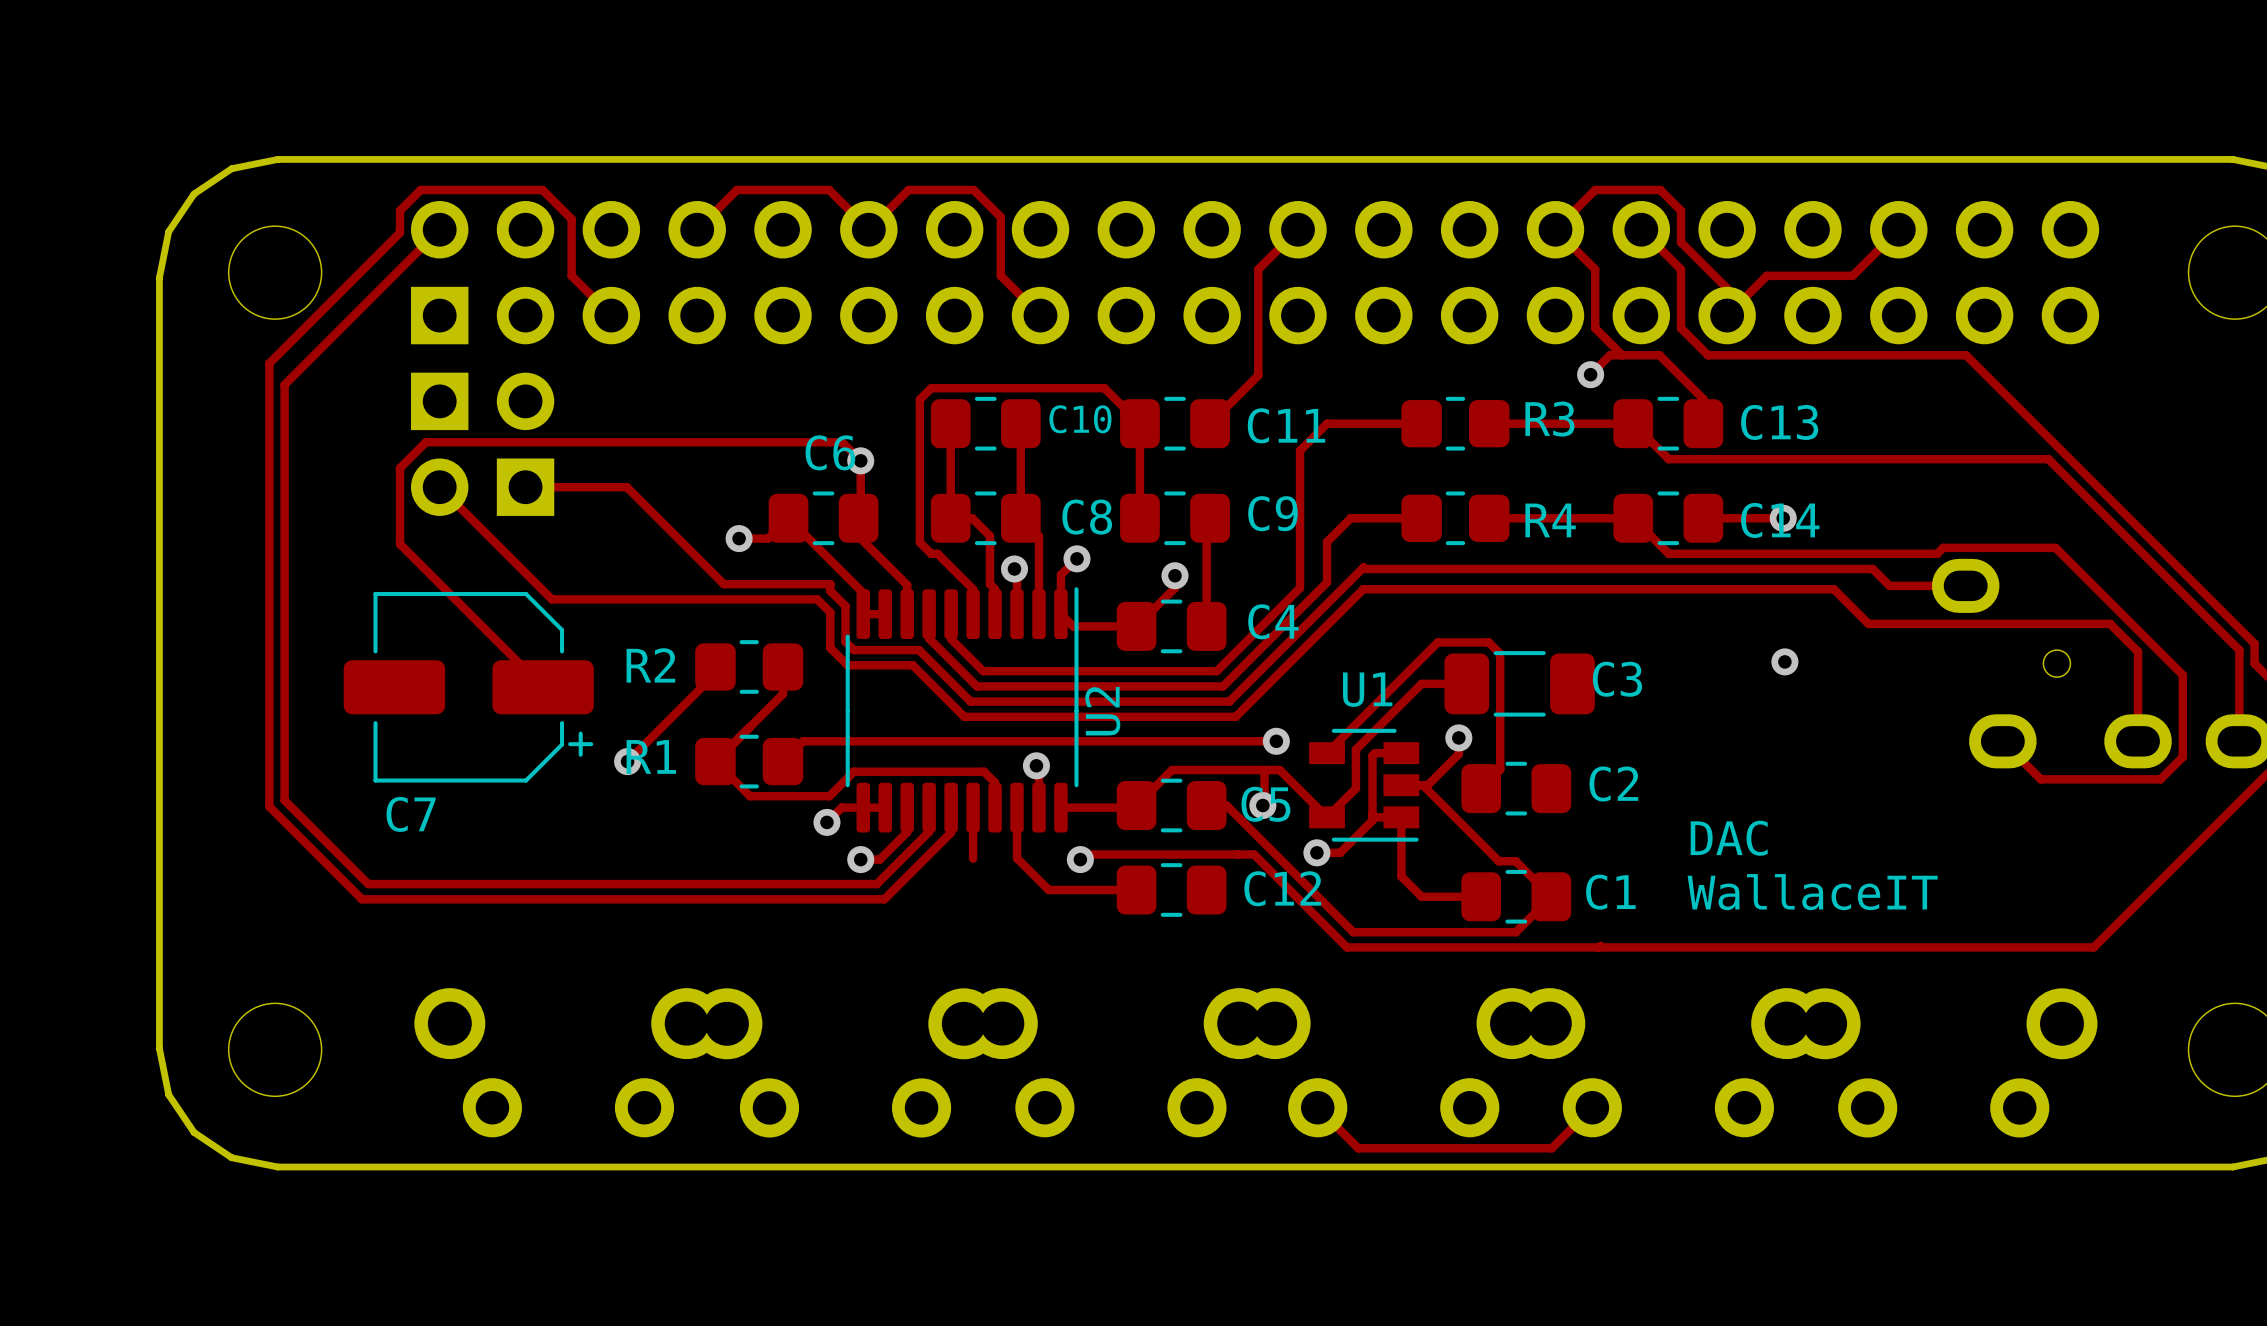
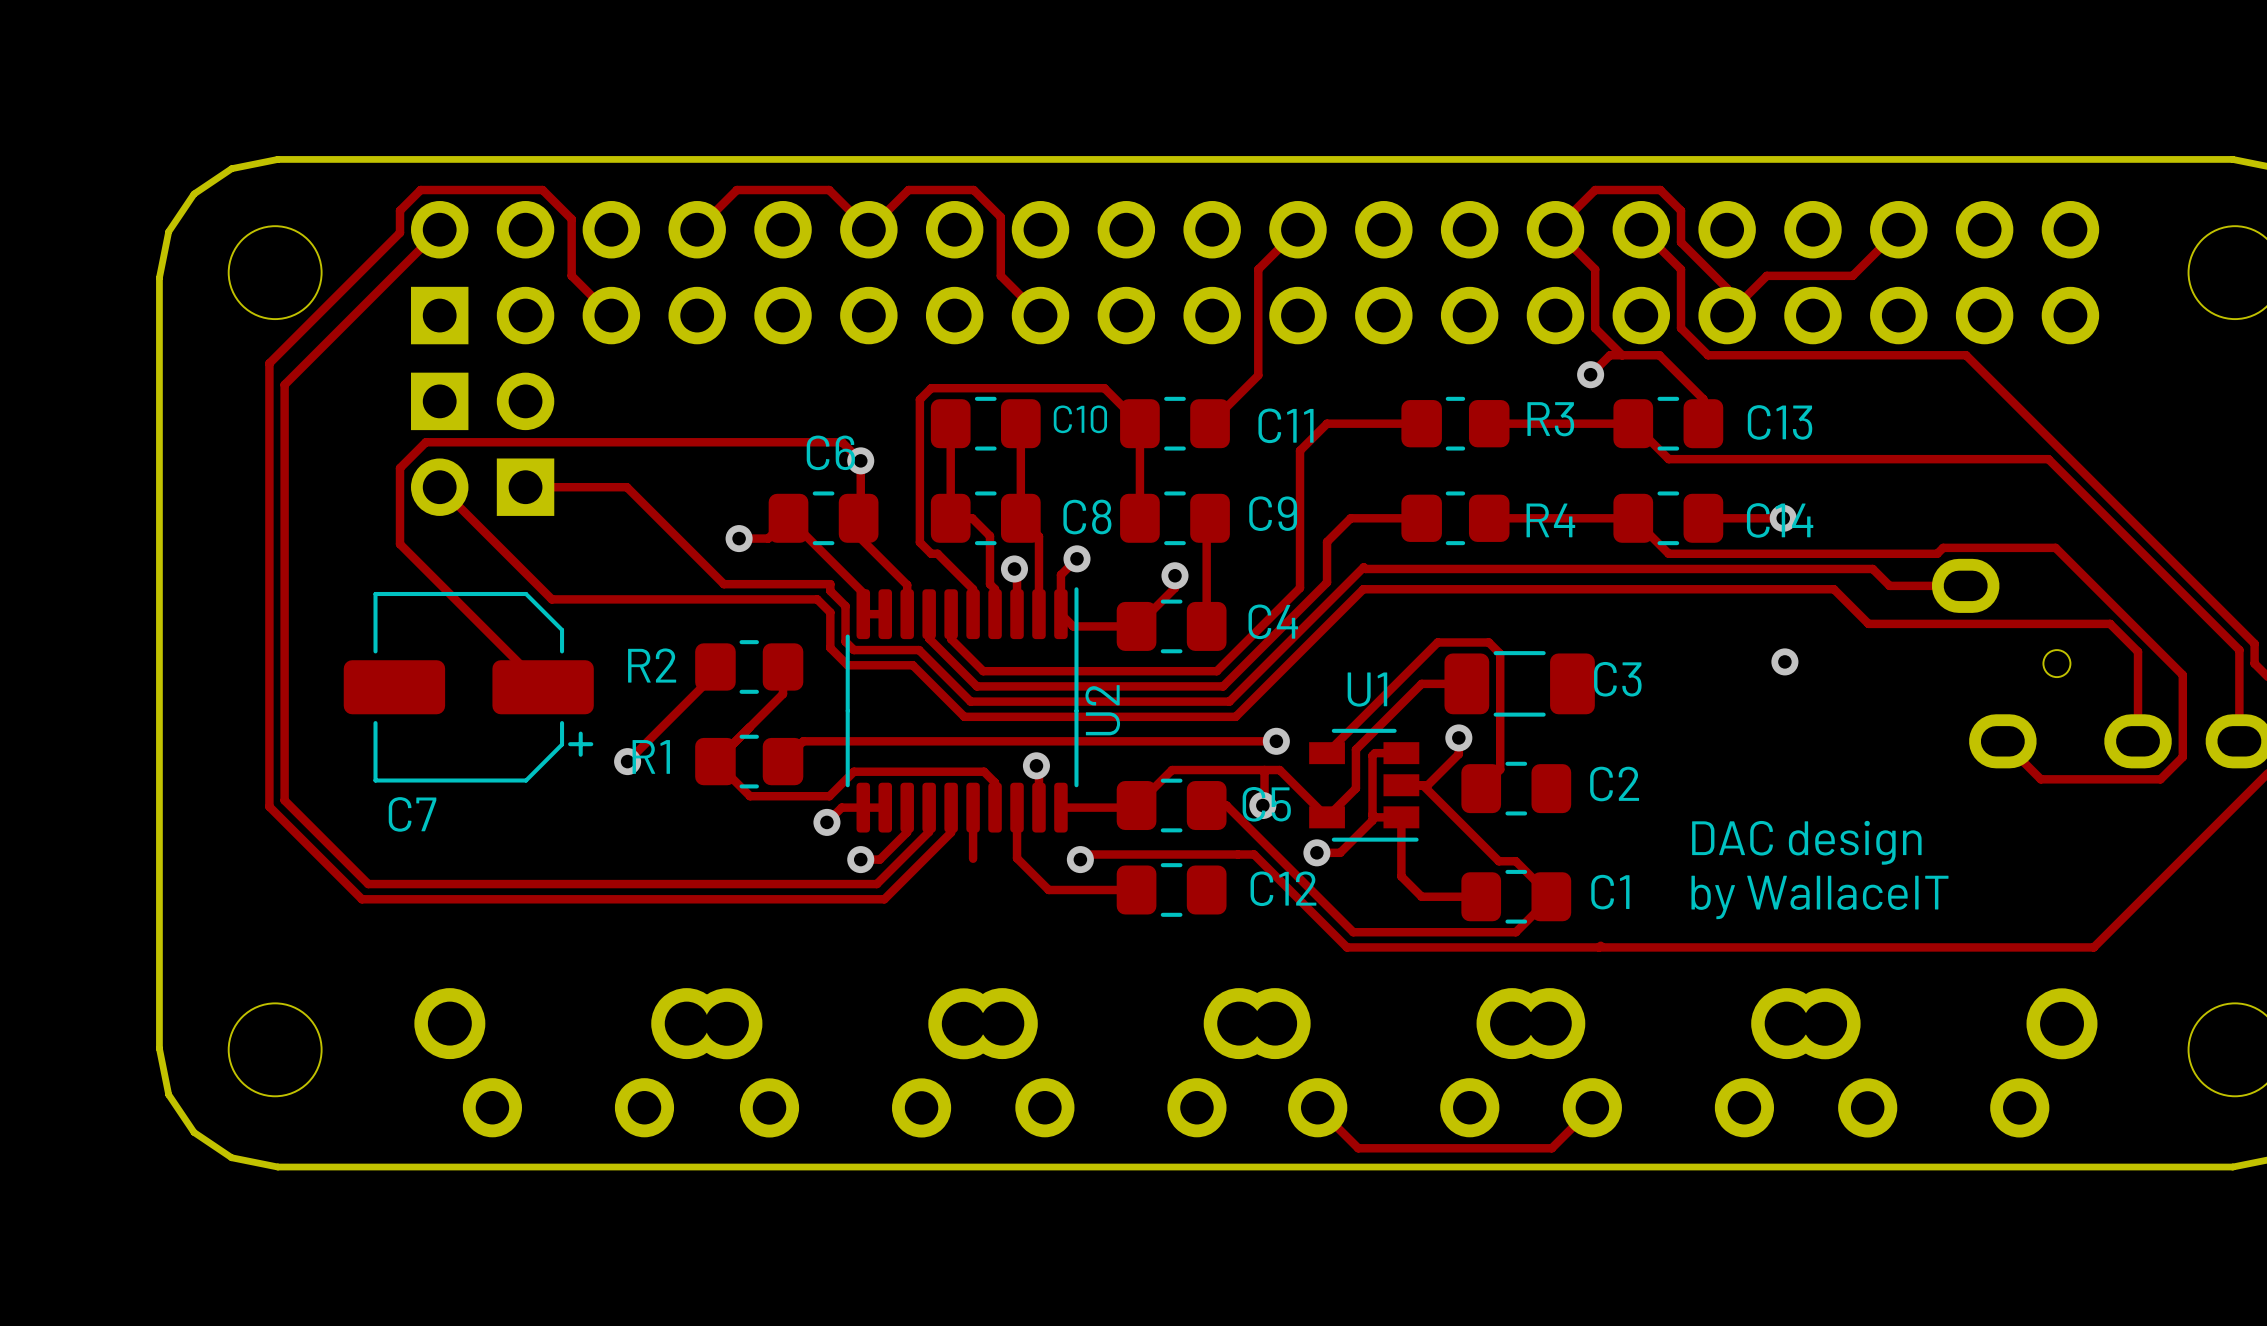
text: DAC (1729, 838) -> DAC design (1806, 842)
text: WallaceIT (1812, 892) -> by WallaceIT (1819, 897)

